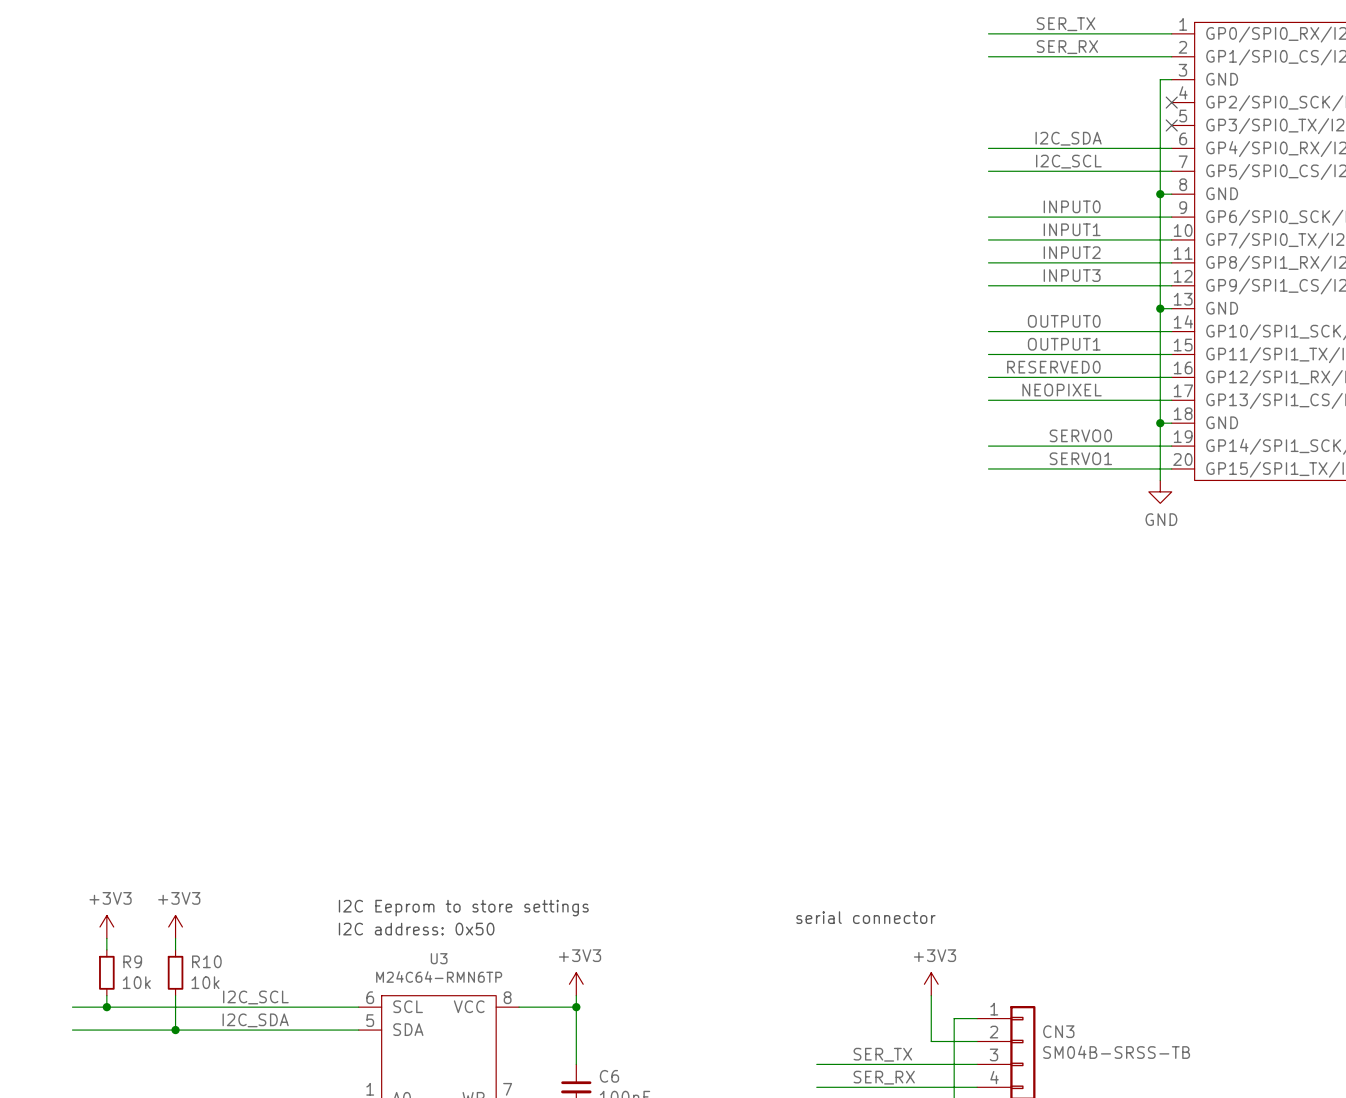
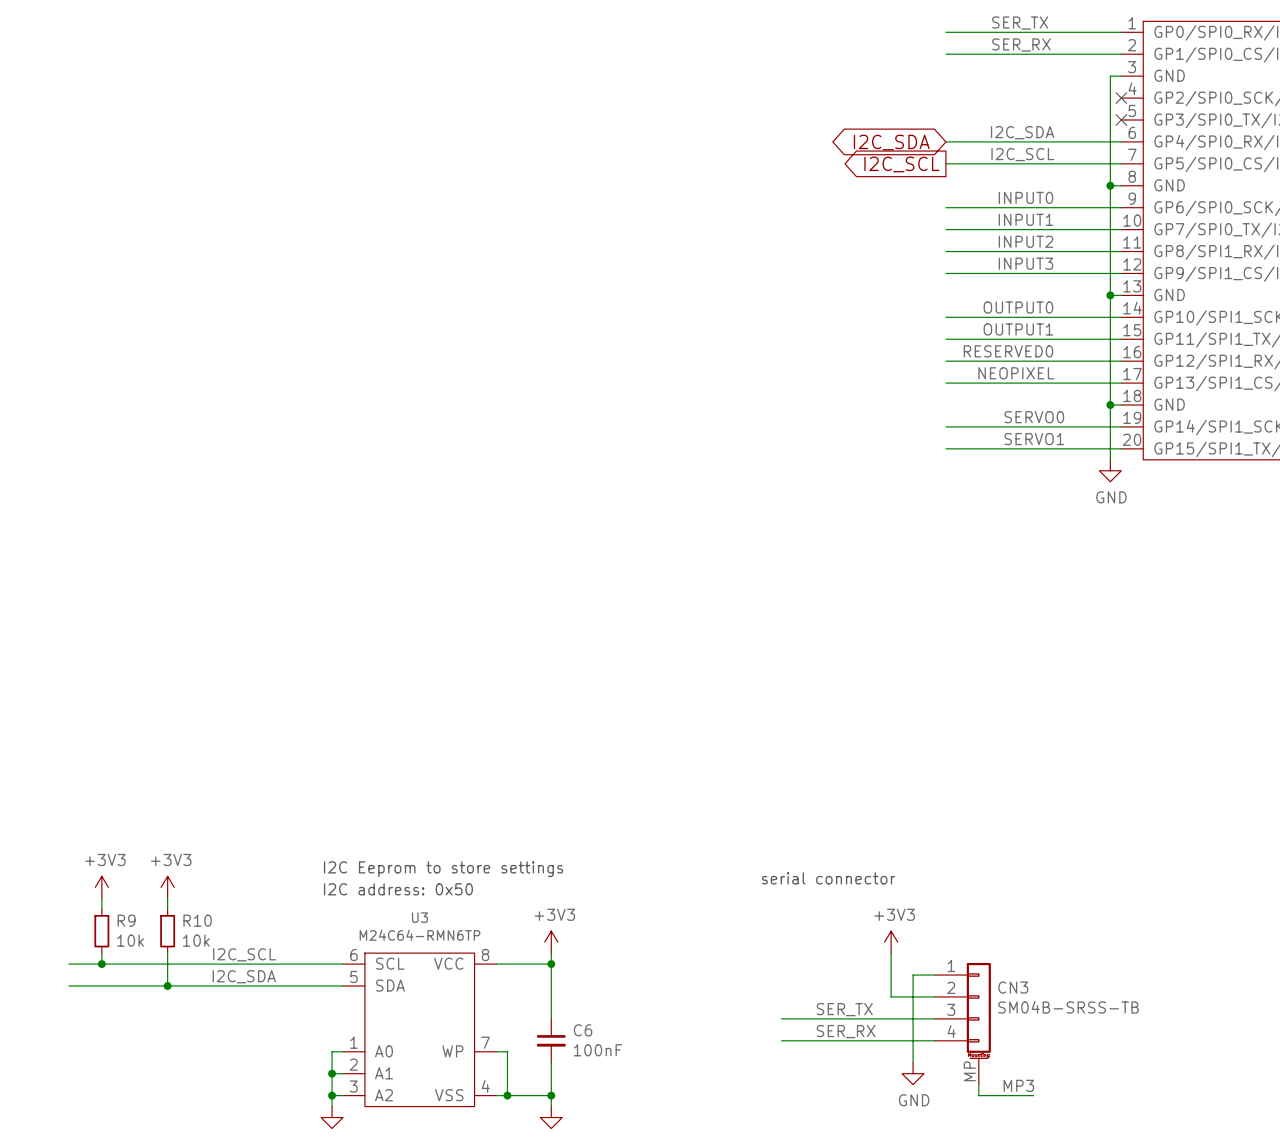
global label: none -> I2C_SDA (891, 142)
global label: none -> I2C_SCL (901, 164)

